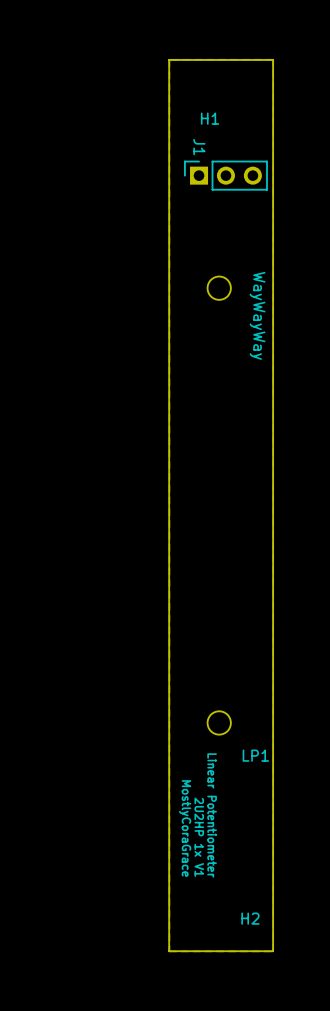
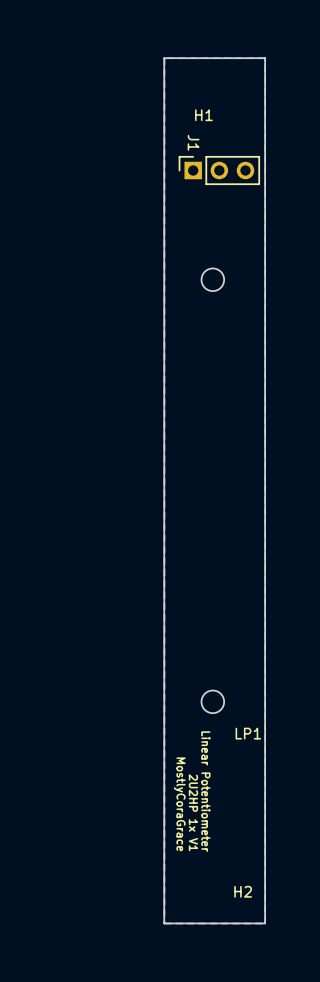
text: WayWayWay (257, 315) -> none

